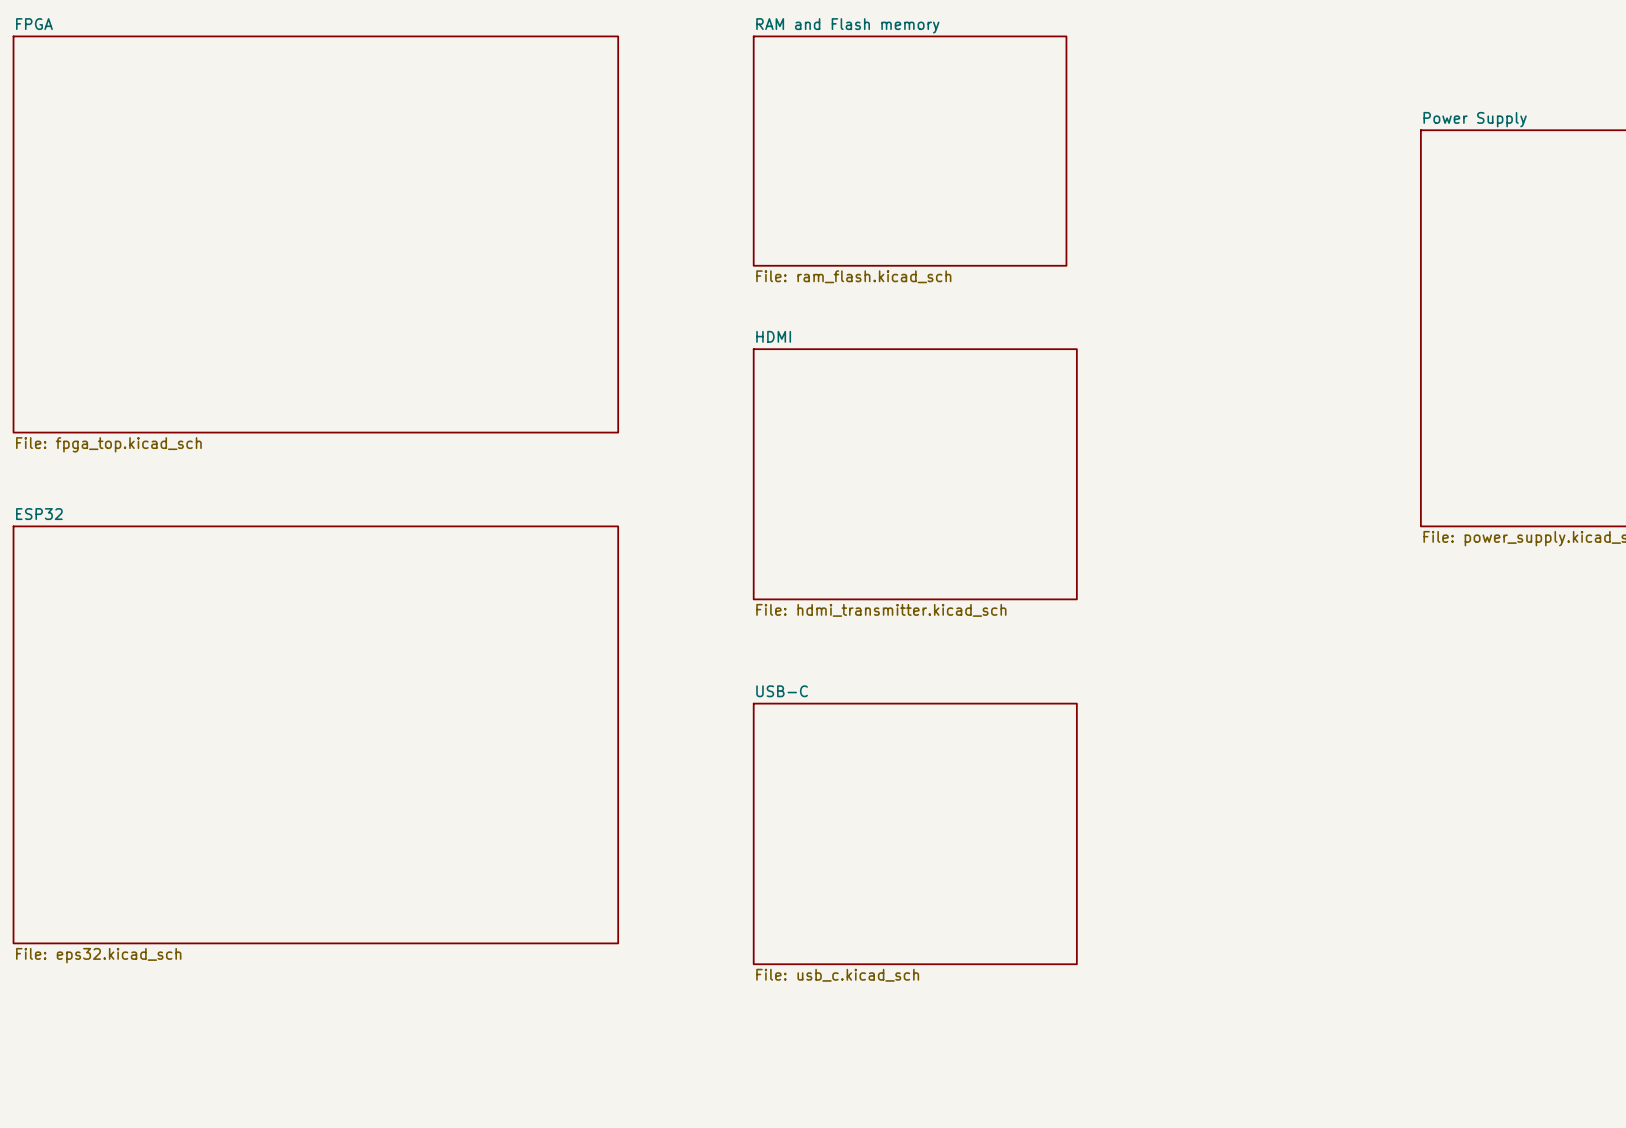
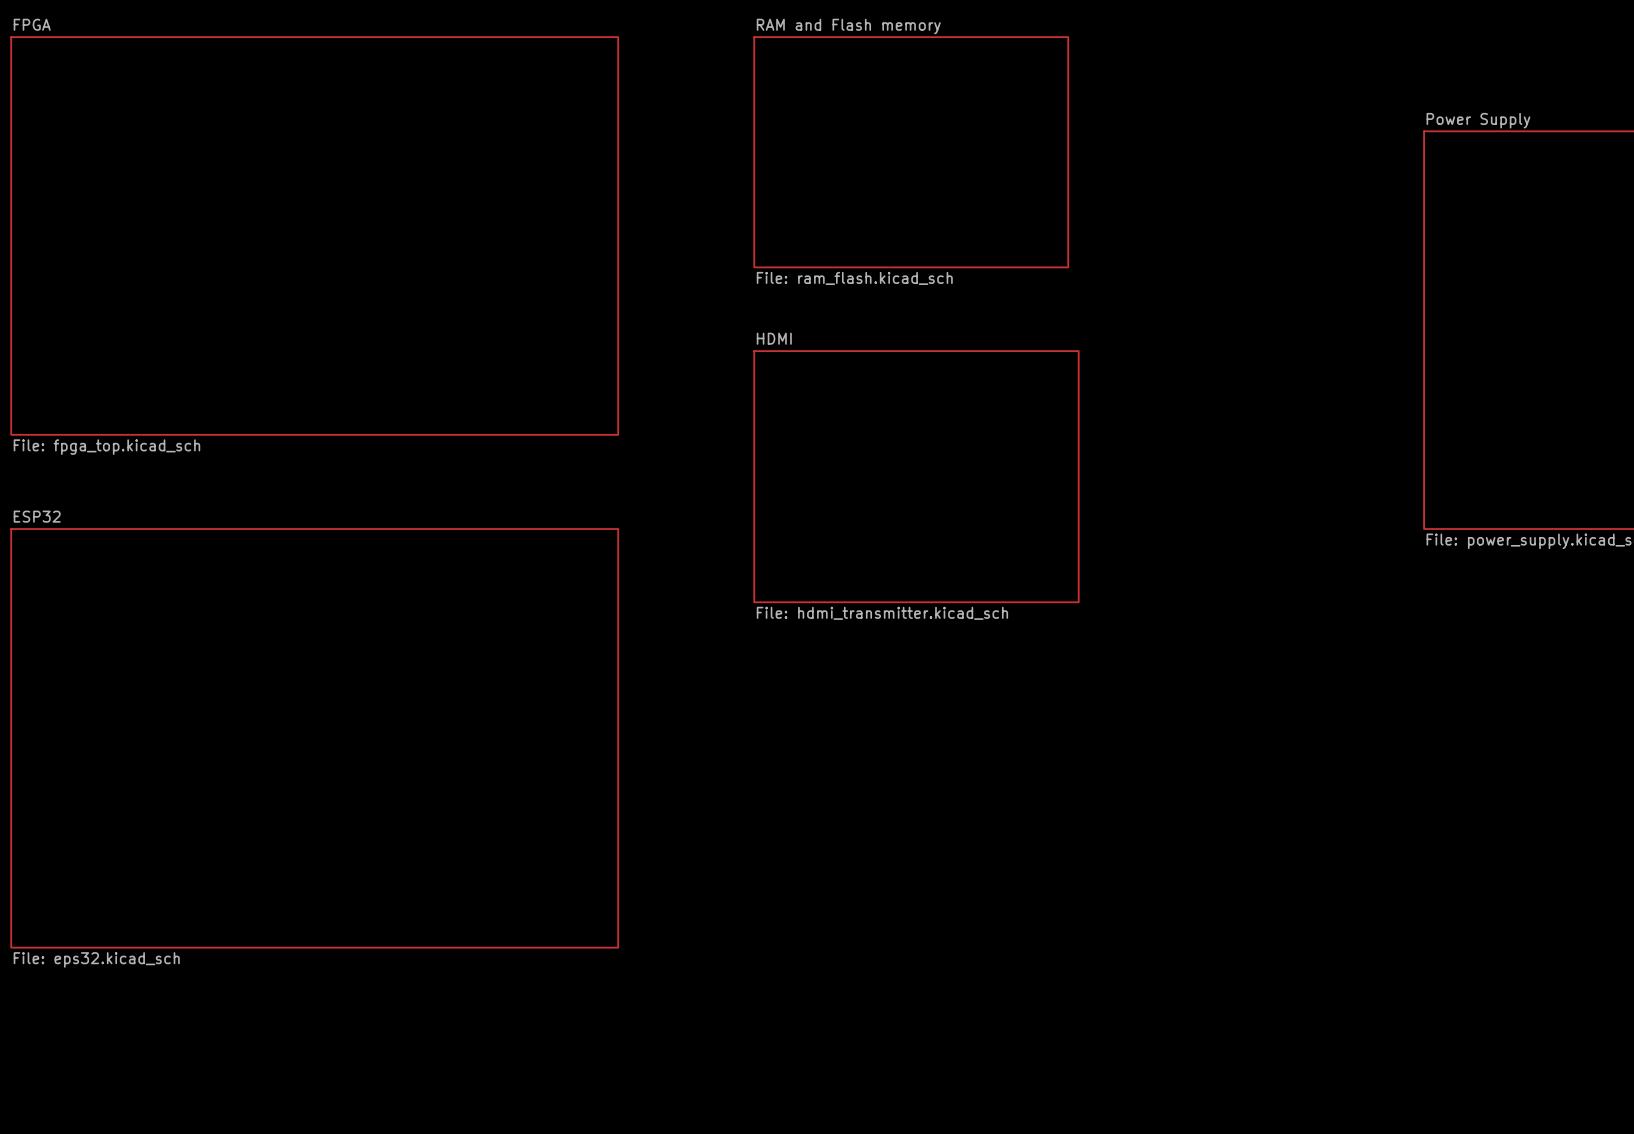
sheet USB-C: File: usb_c.kicad_sch (915, 833) -> none

